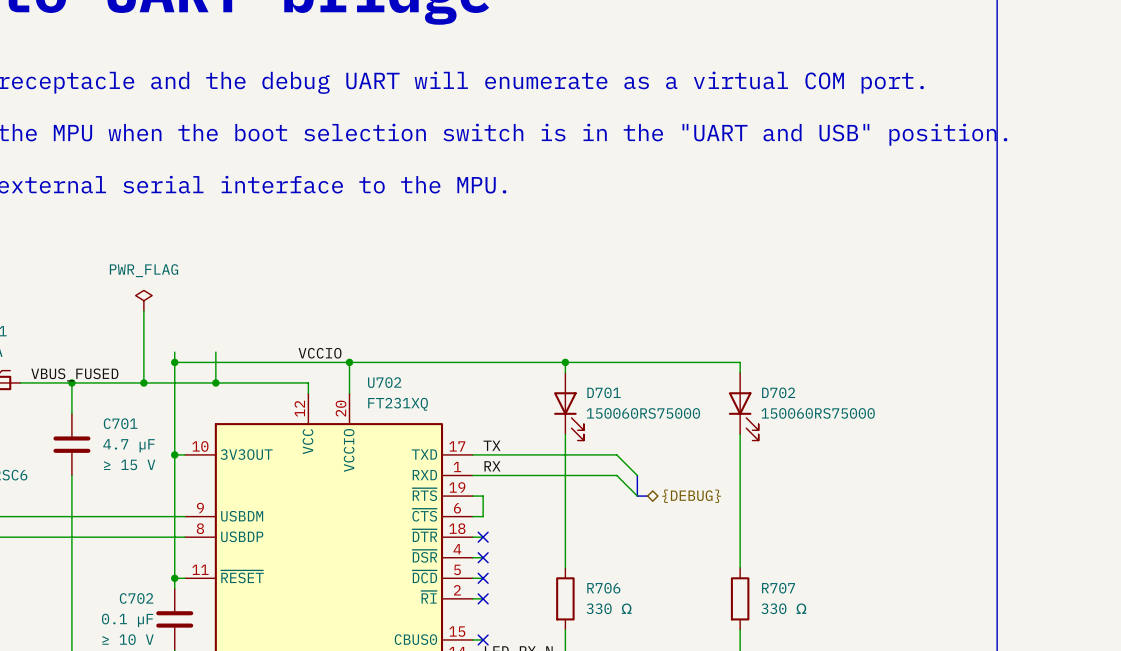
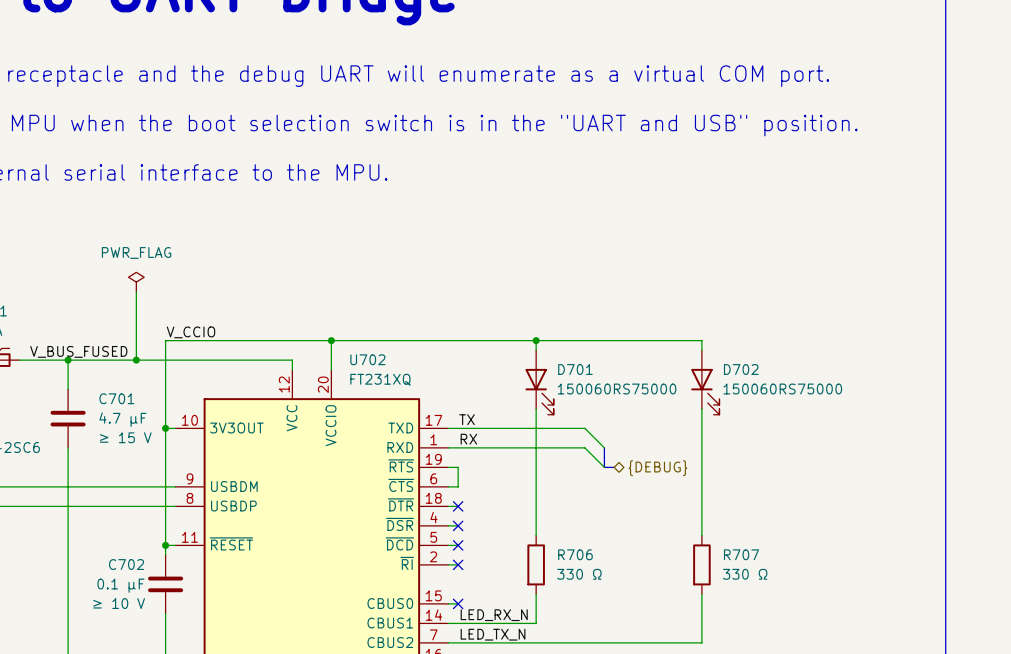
wire: (174, 352) (174, 362) -> none
wire: (215, 352) (215, 382) -> none
label: VCCIO (320, 353) -> none
label: none -> V_CCIO (190, 332)
junction: (174, 362) -> none
label: VBUS_FUSED (74, 374) -> V_BUS_FUSED (78, 351)
junction: (215, 382) -> none

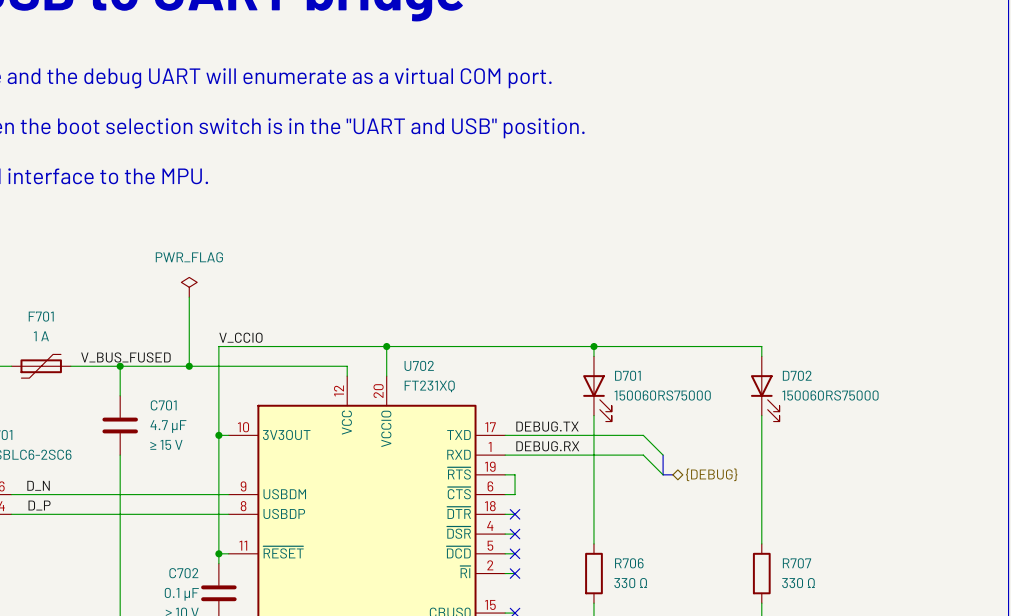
label: TX (467, 419) -> DEBUG.TX (547, 426)
label: RX (468, 439) -> DEBUG.RX (547, 446)

